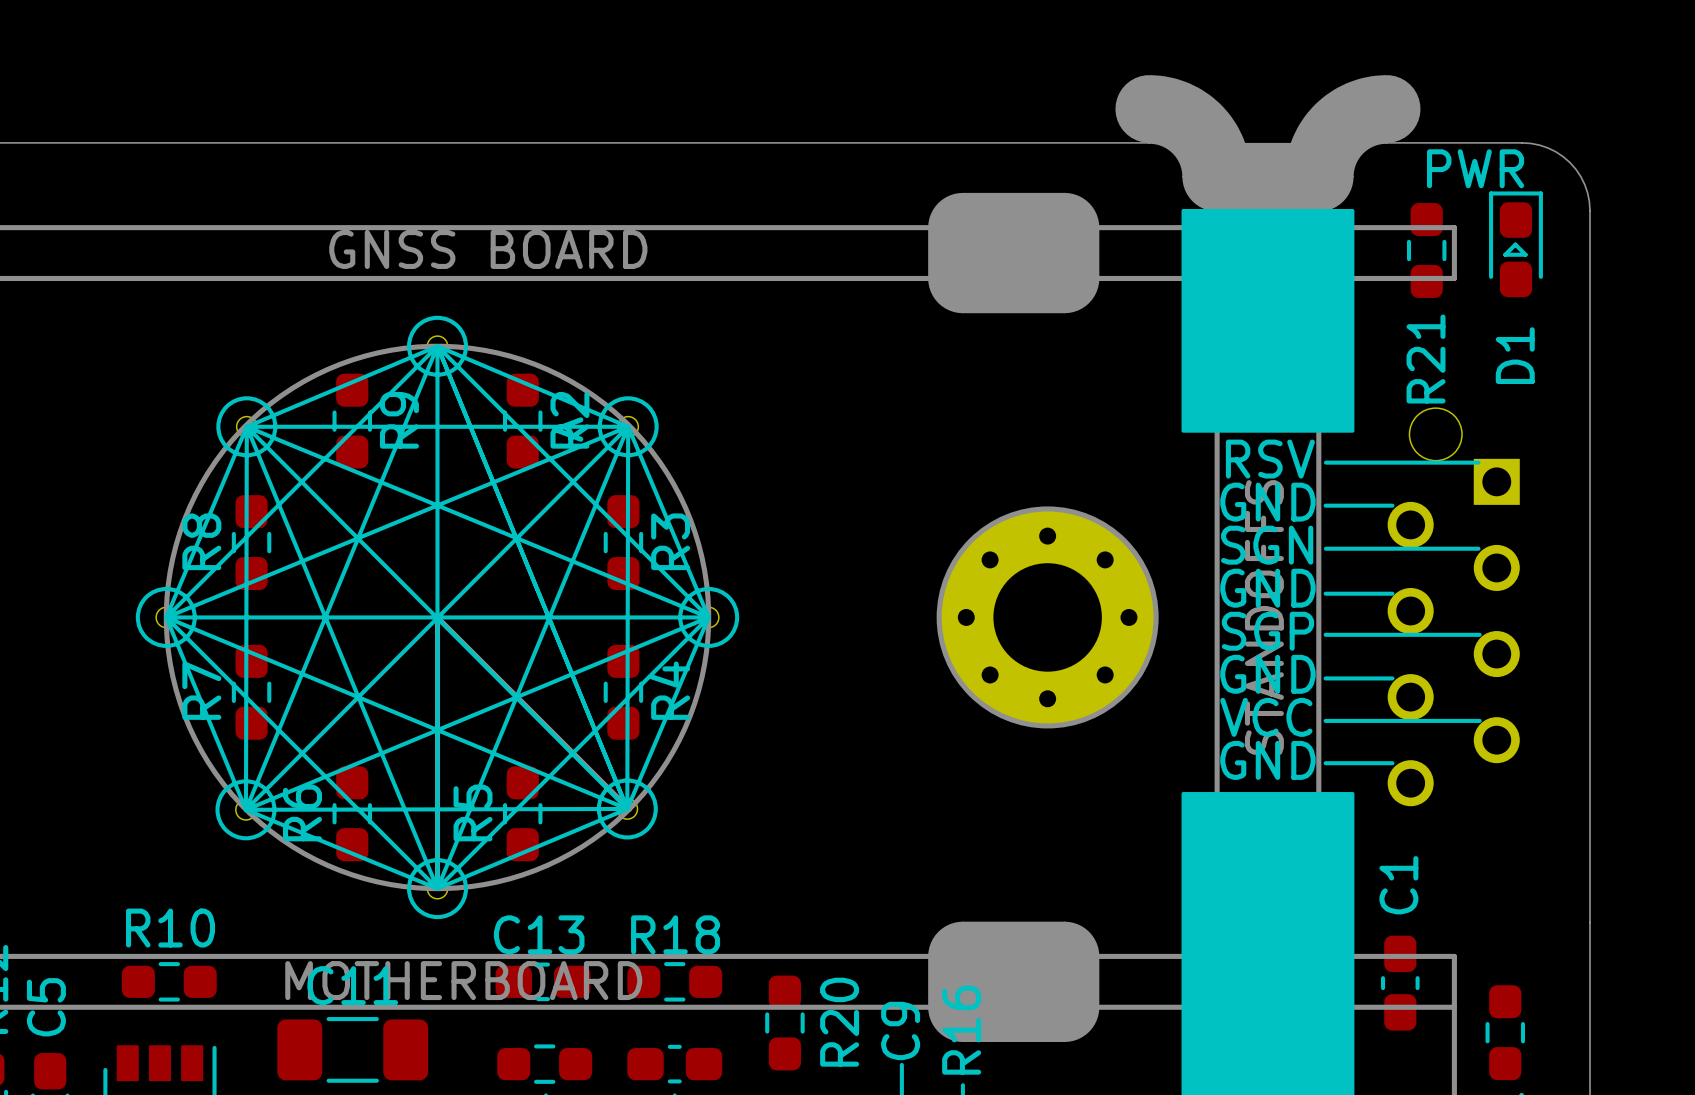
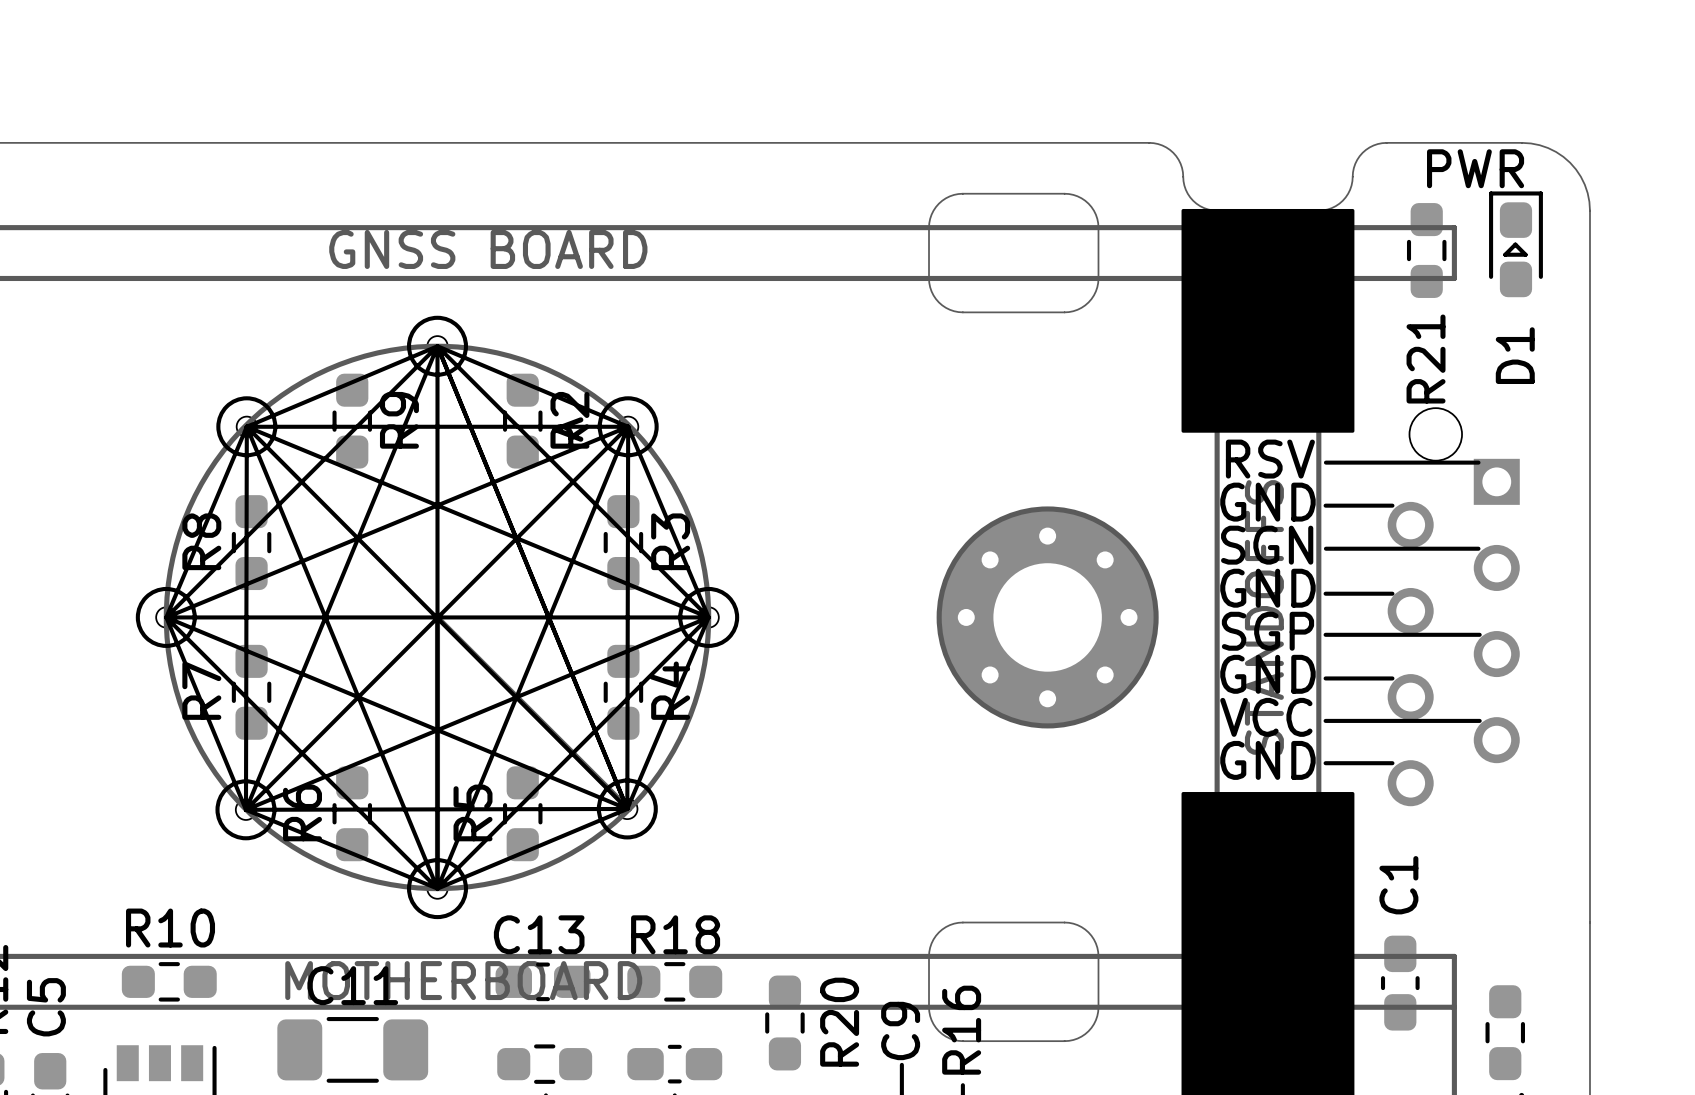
line: (1149, 108) (1175, 114) (1197, 128) (1211, 150) (1217, 176) (1318, 176) (1323, 150) (1338, 128) (1360, 114) (1386, 108) -> none
line: (962, 227) (962, 278) (1064, 278) (1064, 227) (962, 227) -> none
line: (962, 956) (1064, 956) (1064, 1007) (962, 1007) (962, 956) -> none

